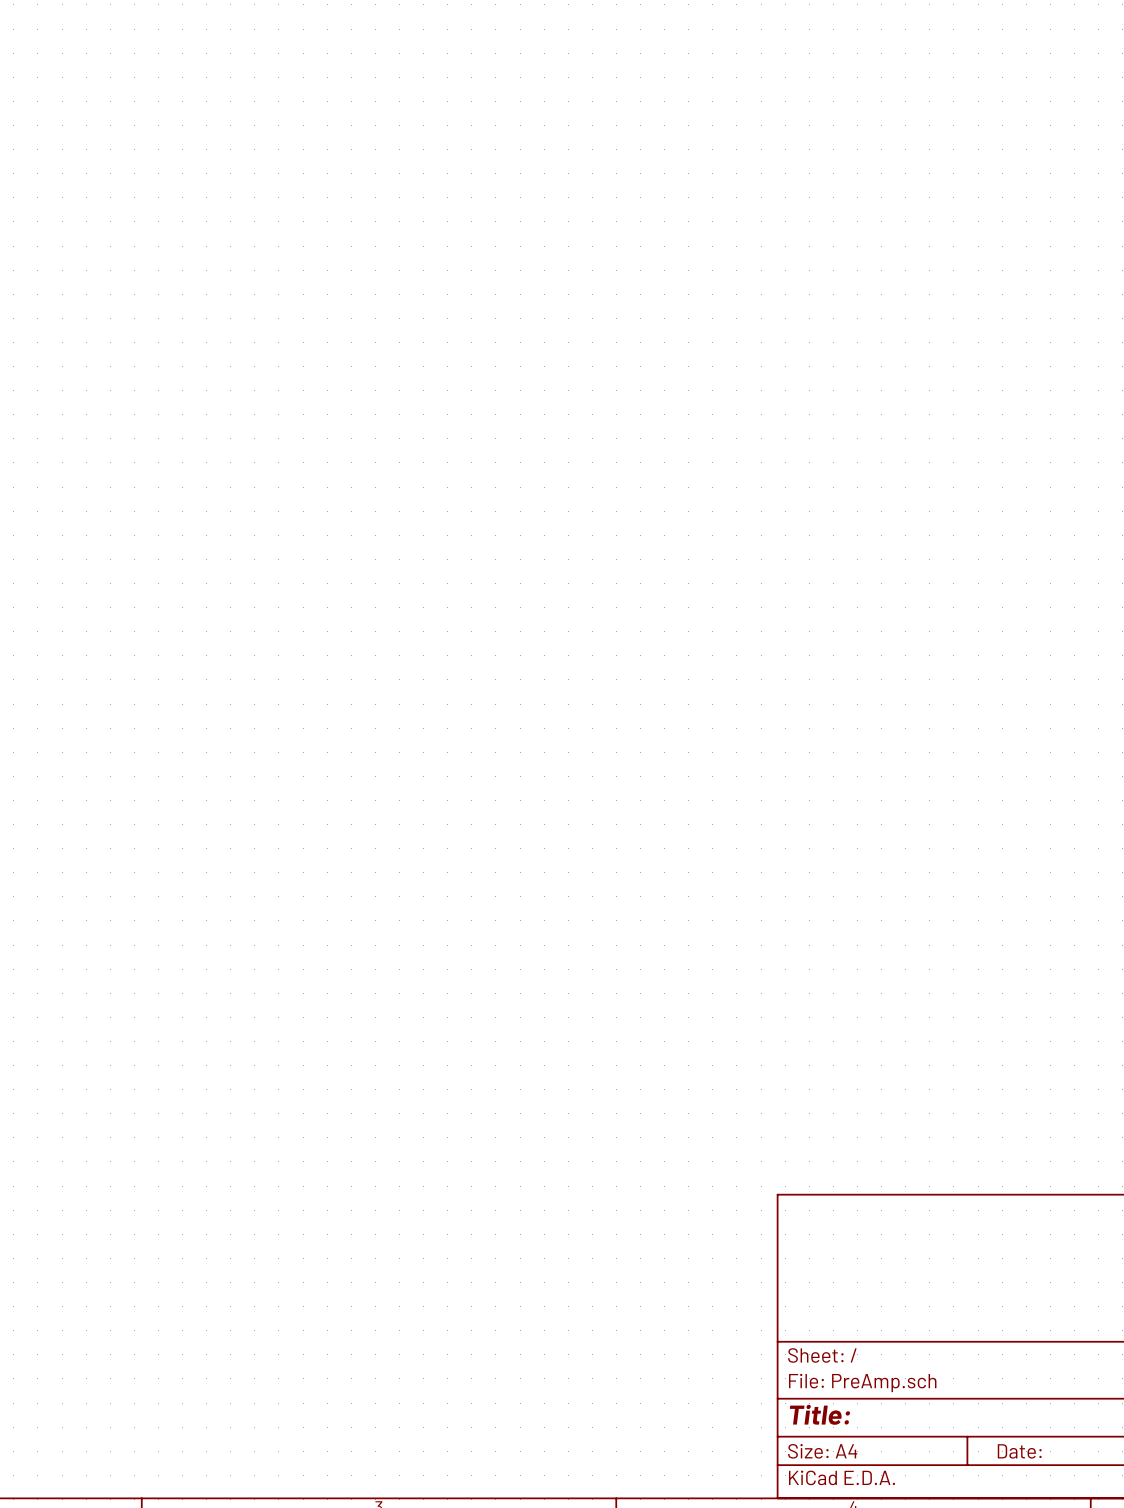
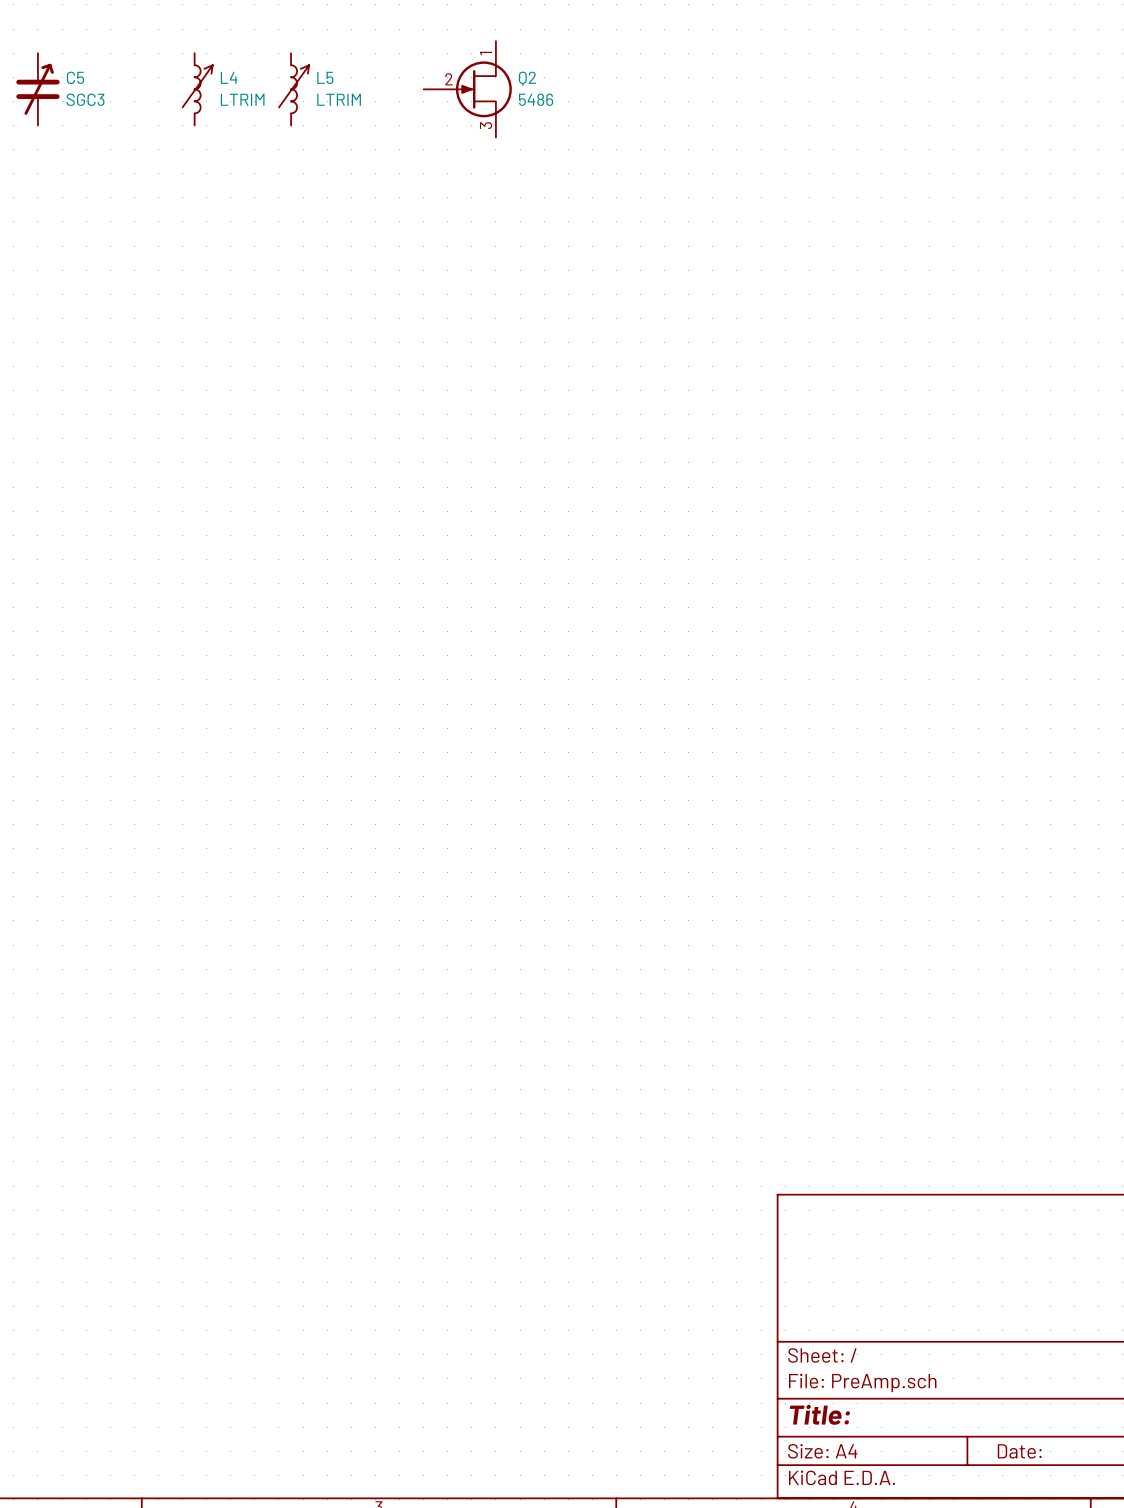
C5: none -> SGC3 (37, 89)
L4: none -> LTRIM (197, 89)
L5: none -> LTRIM (294, 89)
Q2: none -> 5486 (467, 89)

